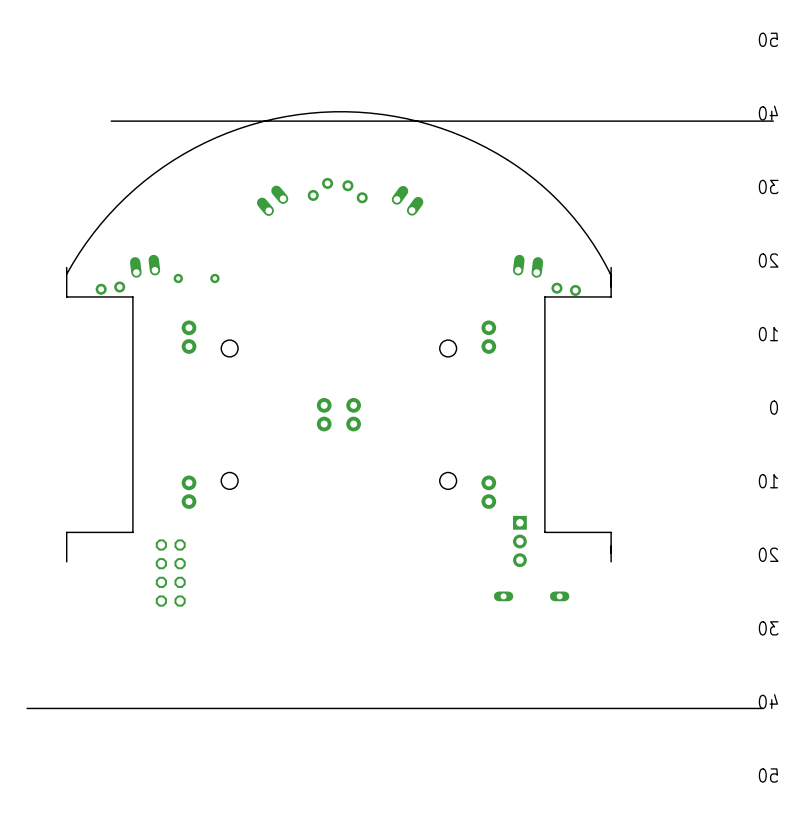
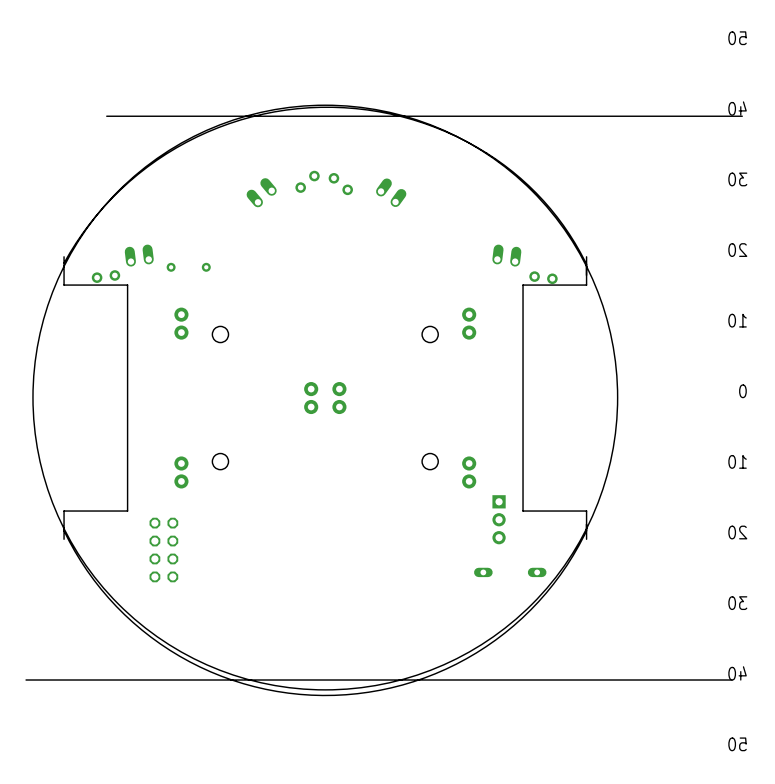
round board edge: none -> [32, 104, 618, 691]
board edge: none -> (586, 530) (566, 565) (538, 601) (513, 625) (476, 652) (435, 673) (402, 684) (357, 693) (322, 695) (288, 693) (243, 683) (210, 671) (169, 650) (141, 629) (108, 598) (80, 561) (64, 530)

